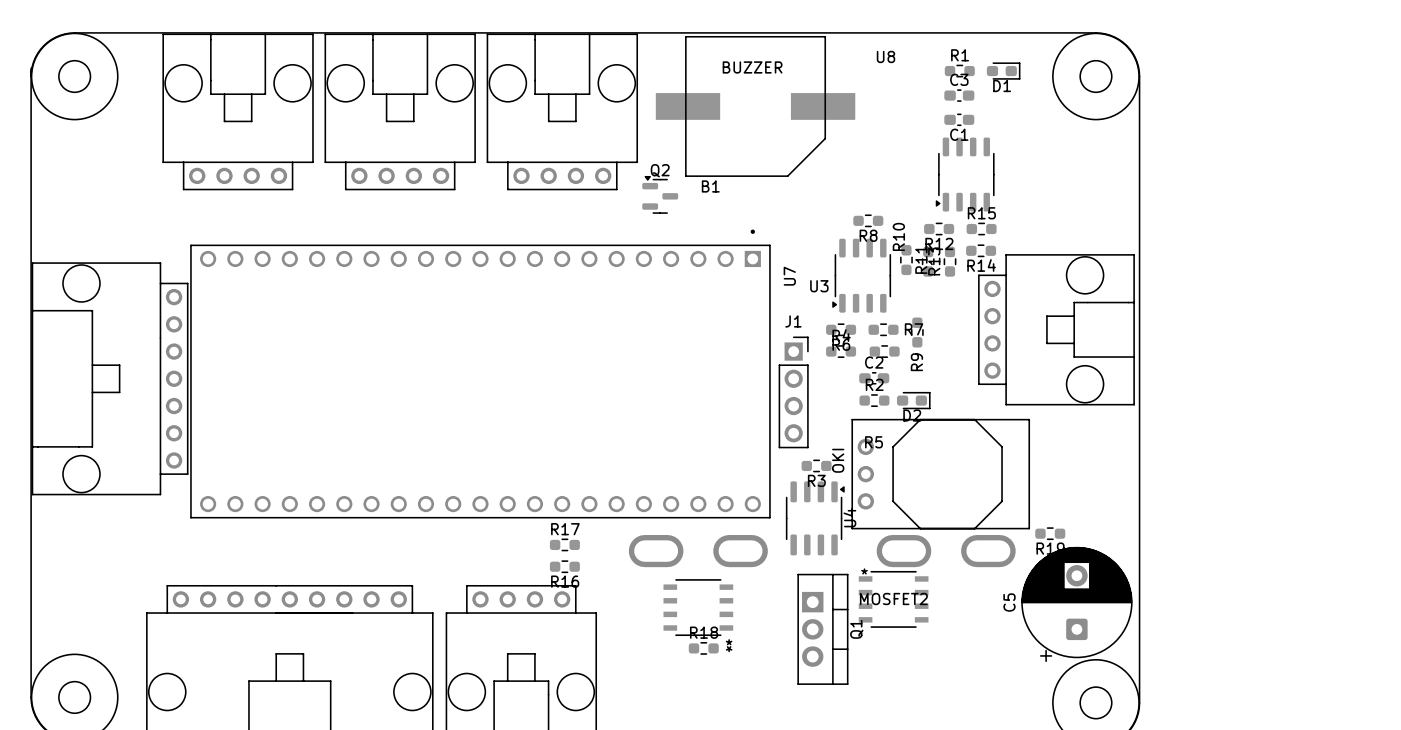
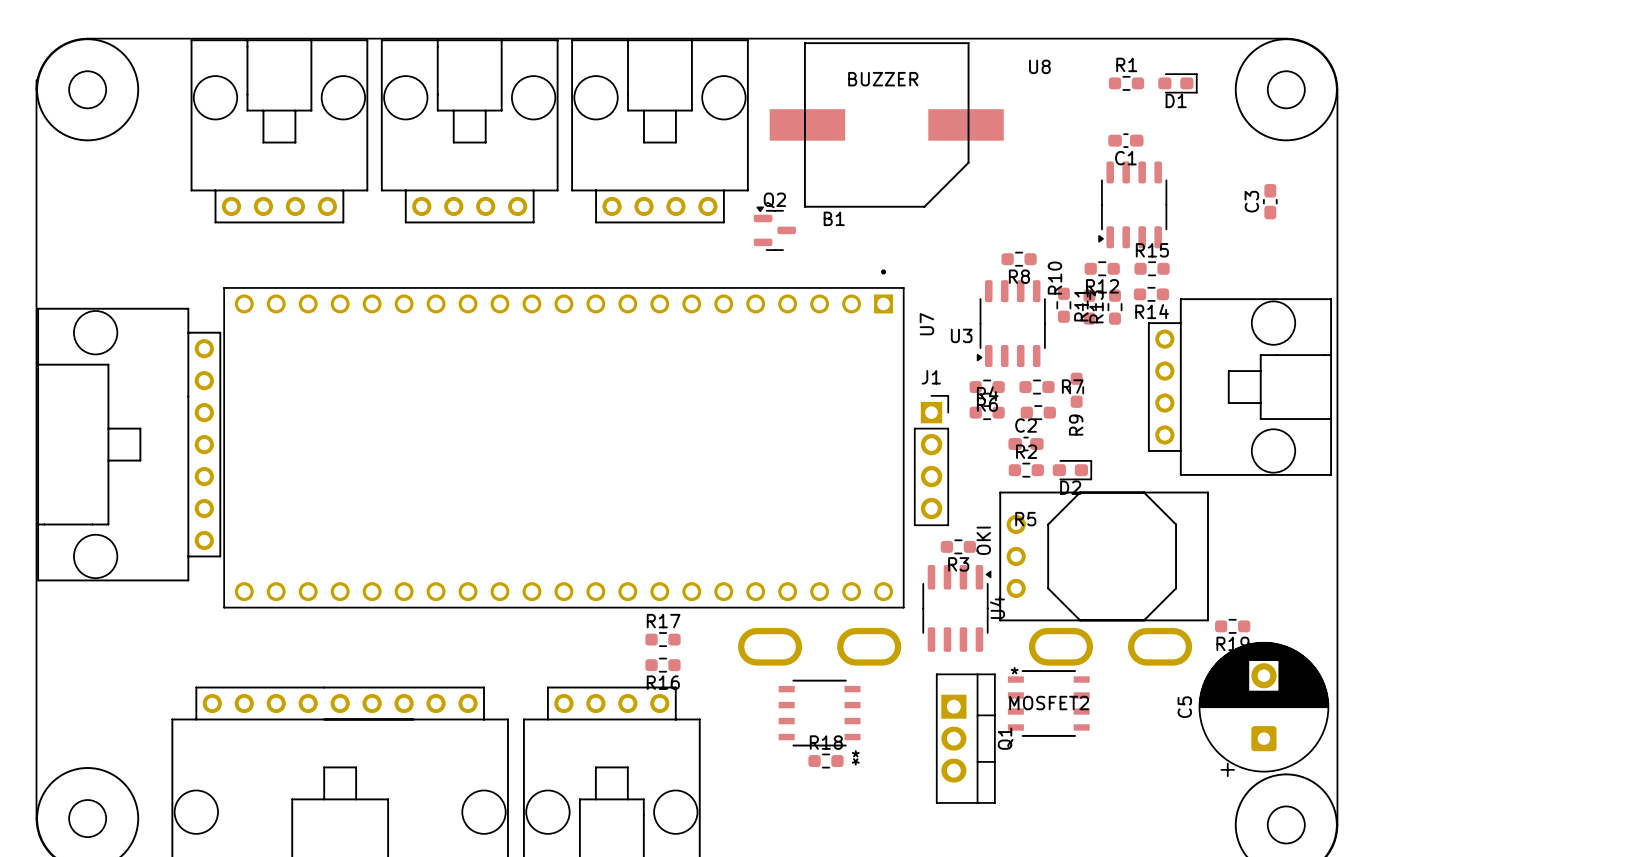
C3 name position: C3 (959, 79) -> C3 (1251, 201)
C3 rotation: 0° (959, 95) -> 90° clockwise (1270, 201)
C3 position: (959, 95) -> (1270, 201)

